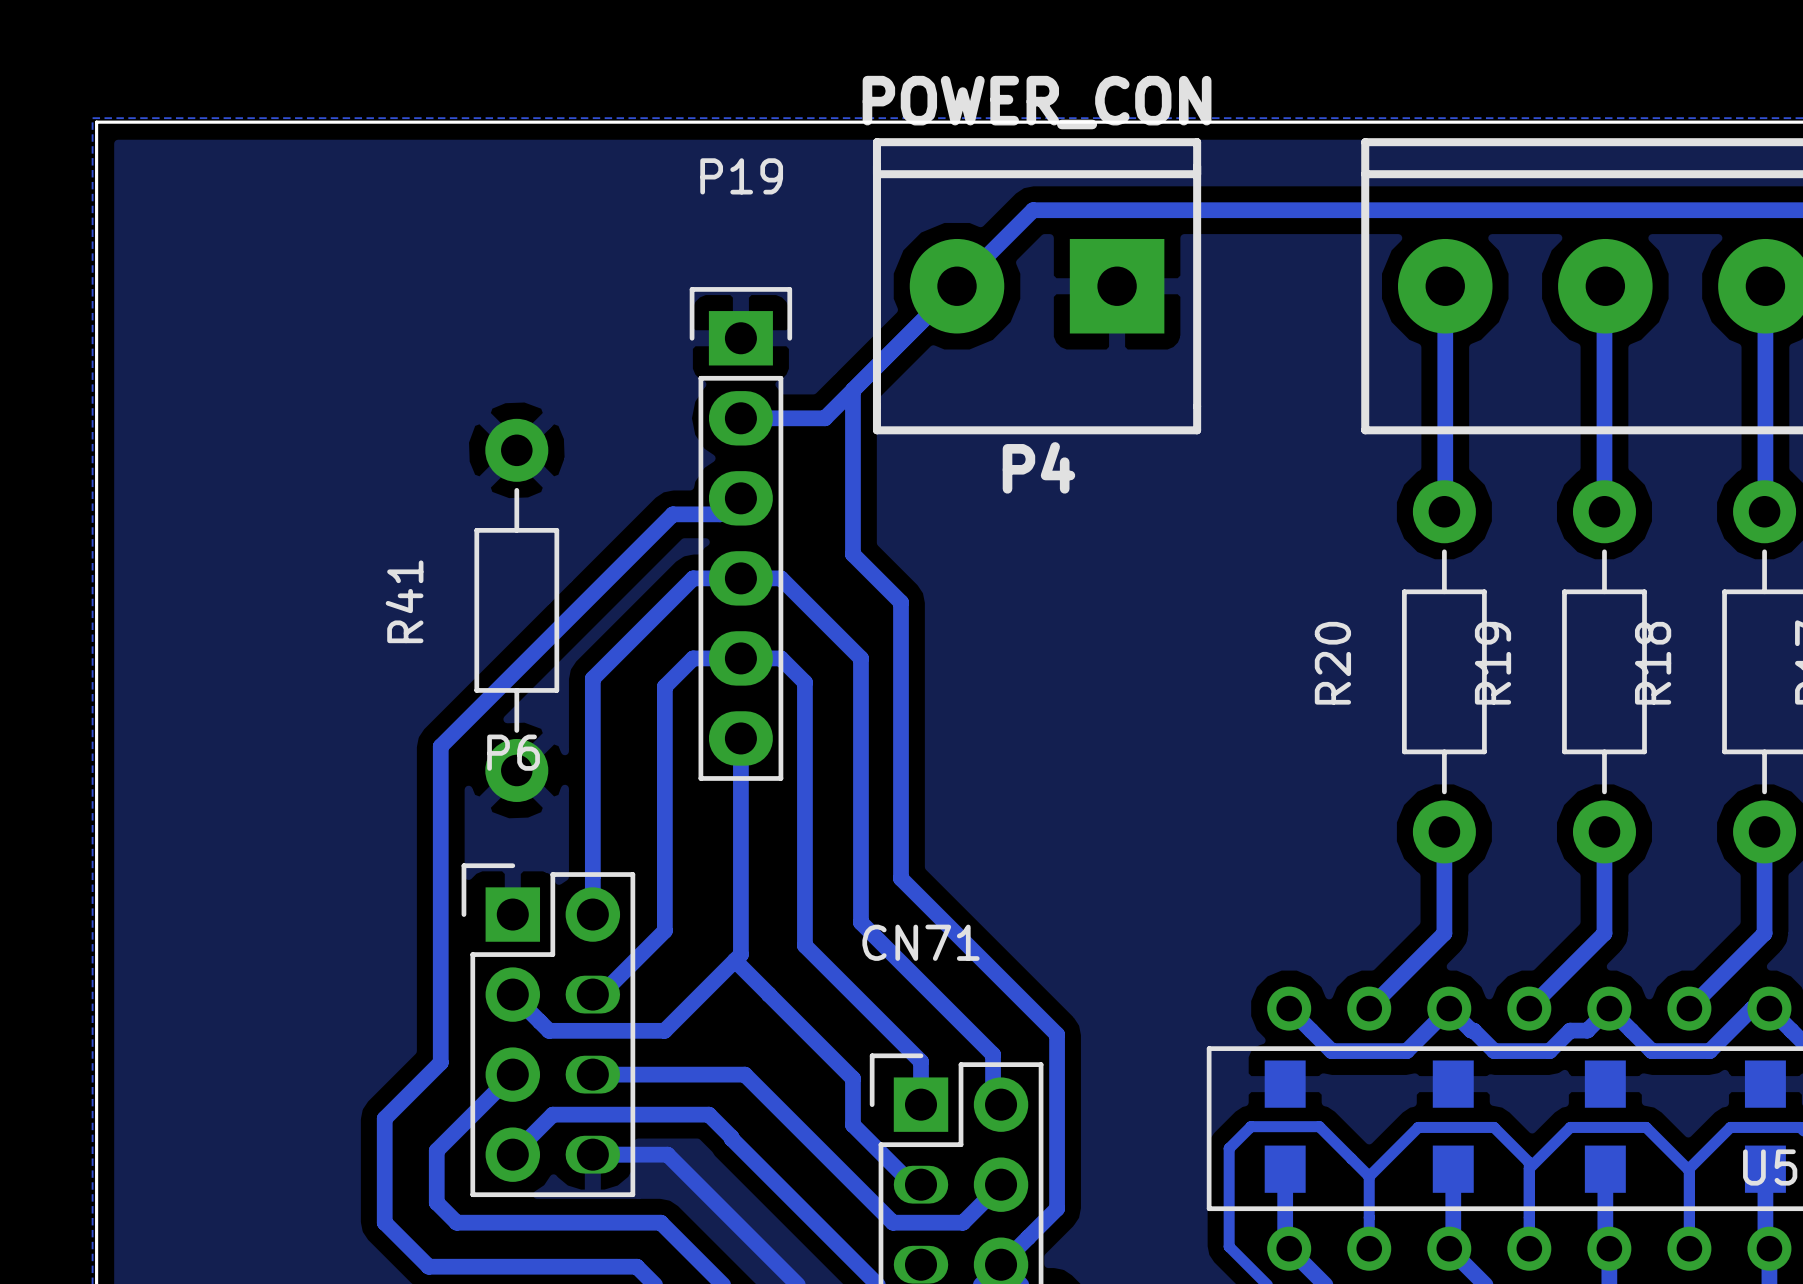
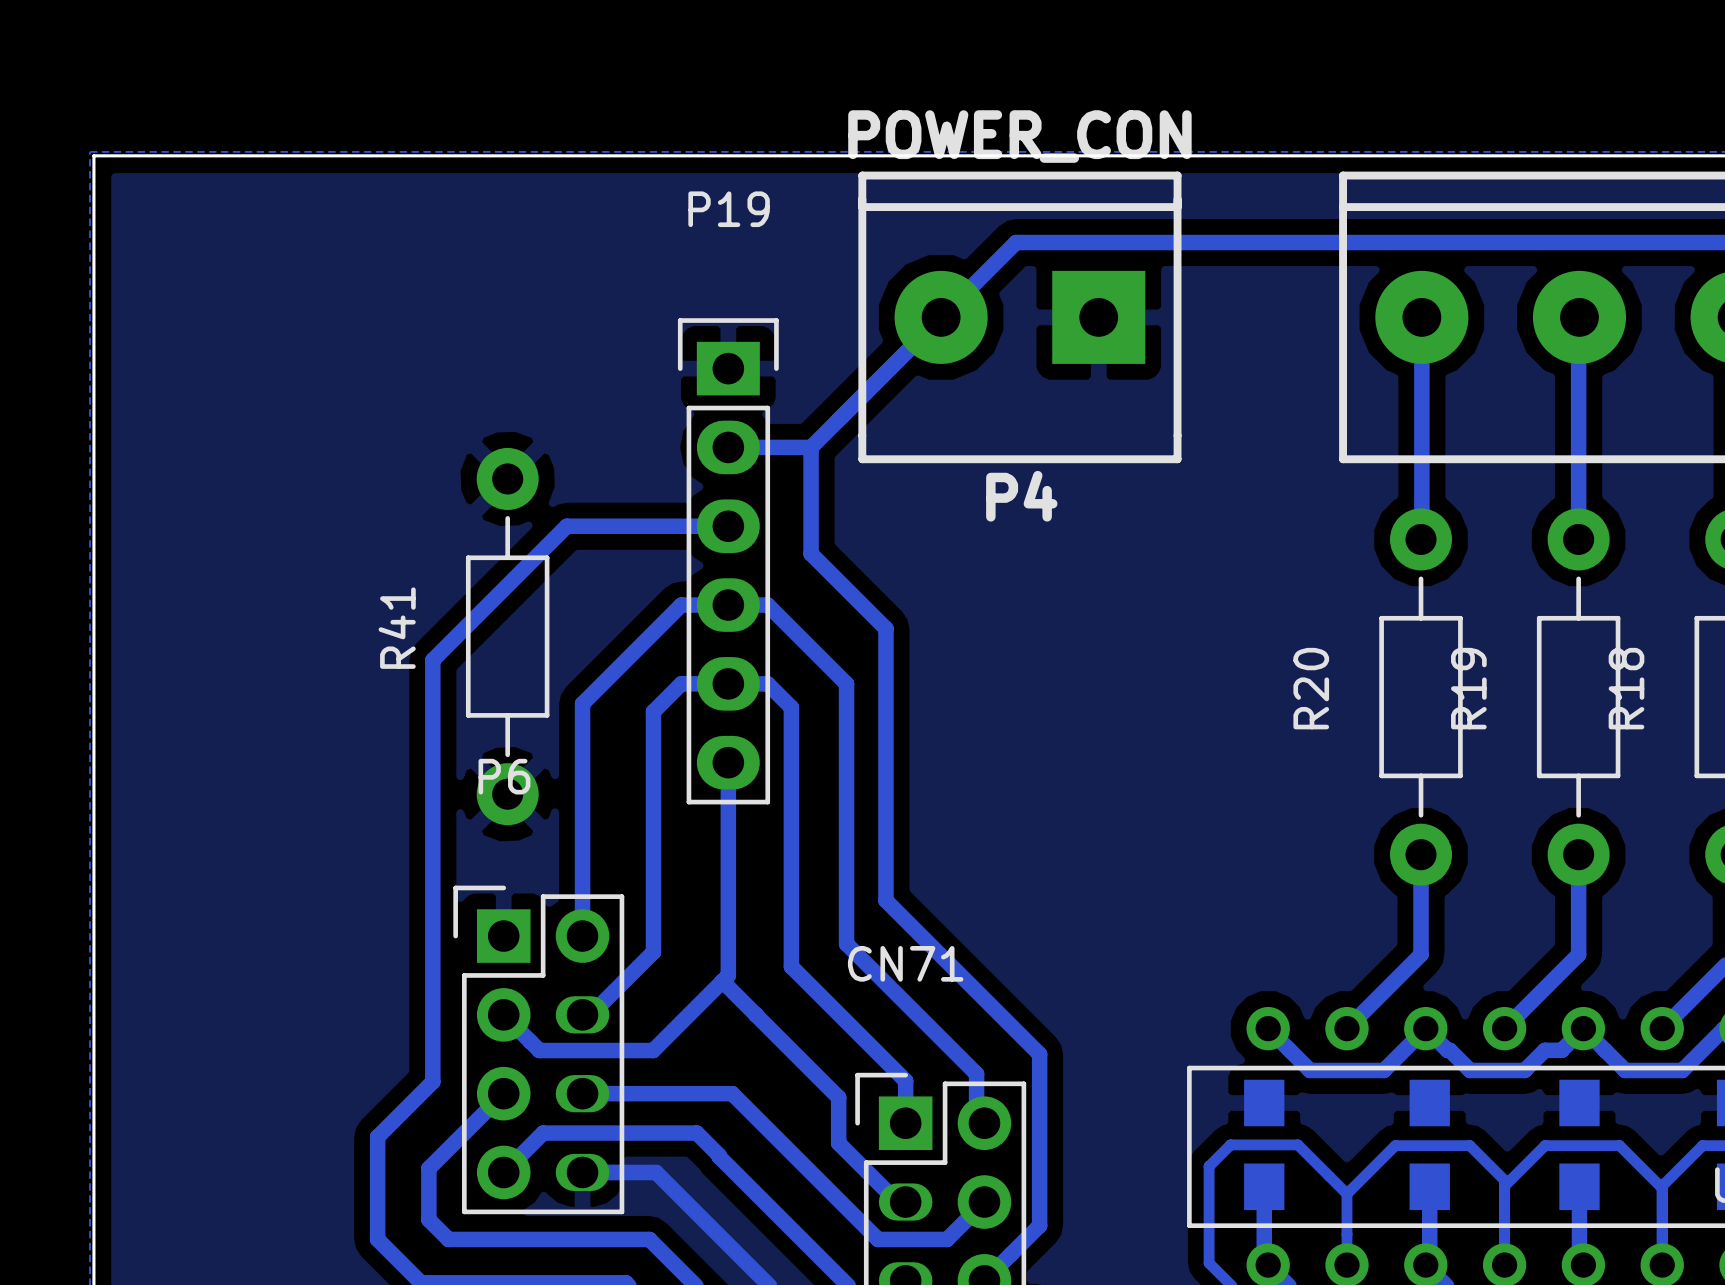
bottom track: (852, 390) (852, 554) -> (811, 447) (811, 553) (838, 581)
bottom track: (736, 498) (720, 514) (672, 514) (440, 746) -> (723, 526) (566, 526) (432, 660) (432, 770)

